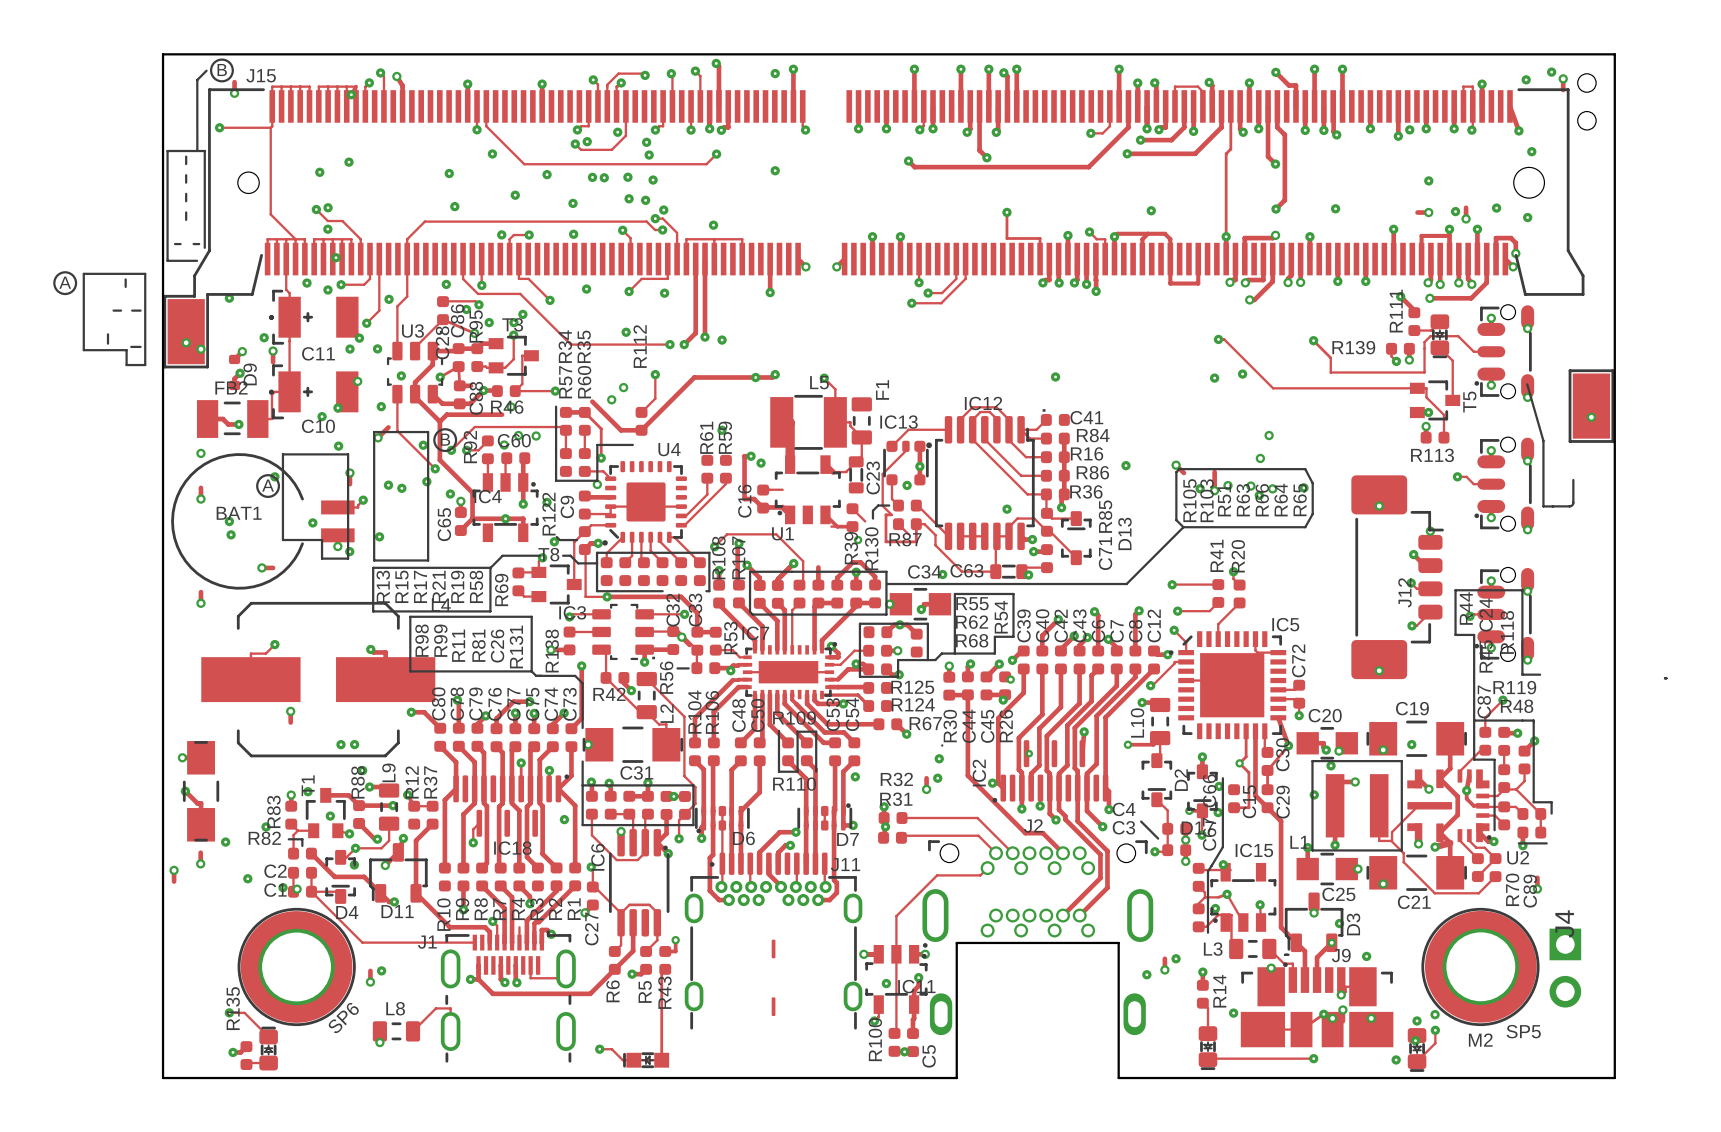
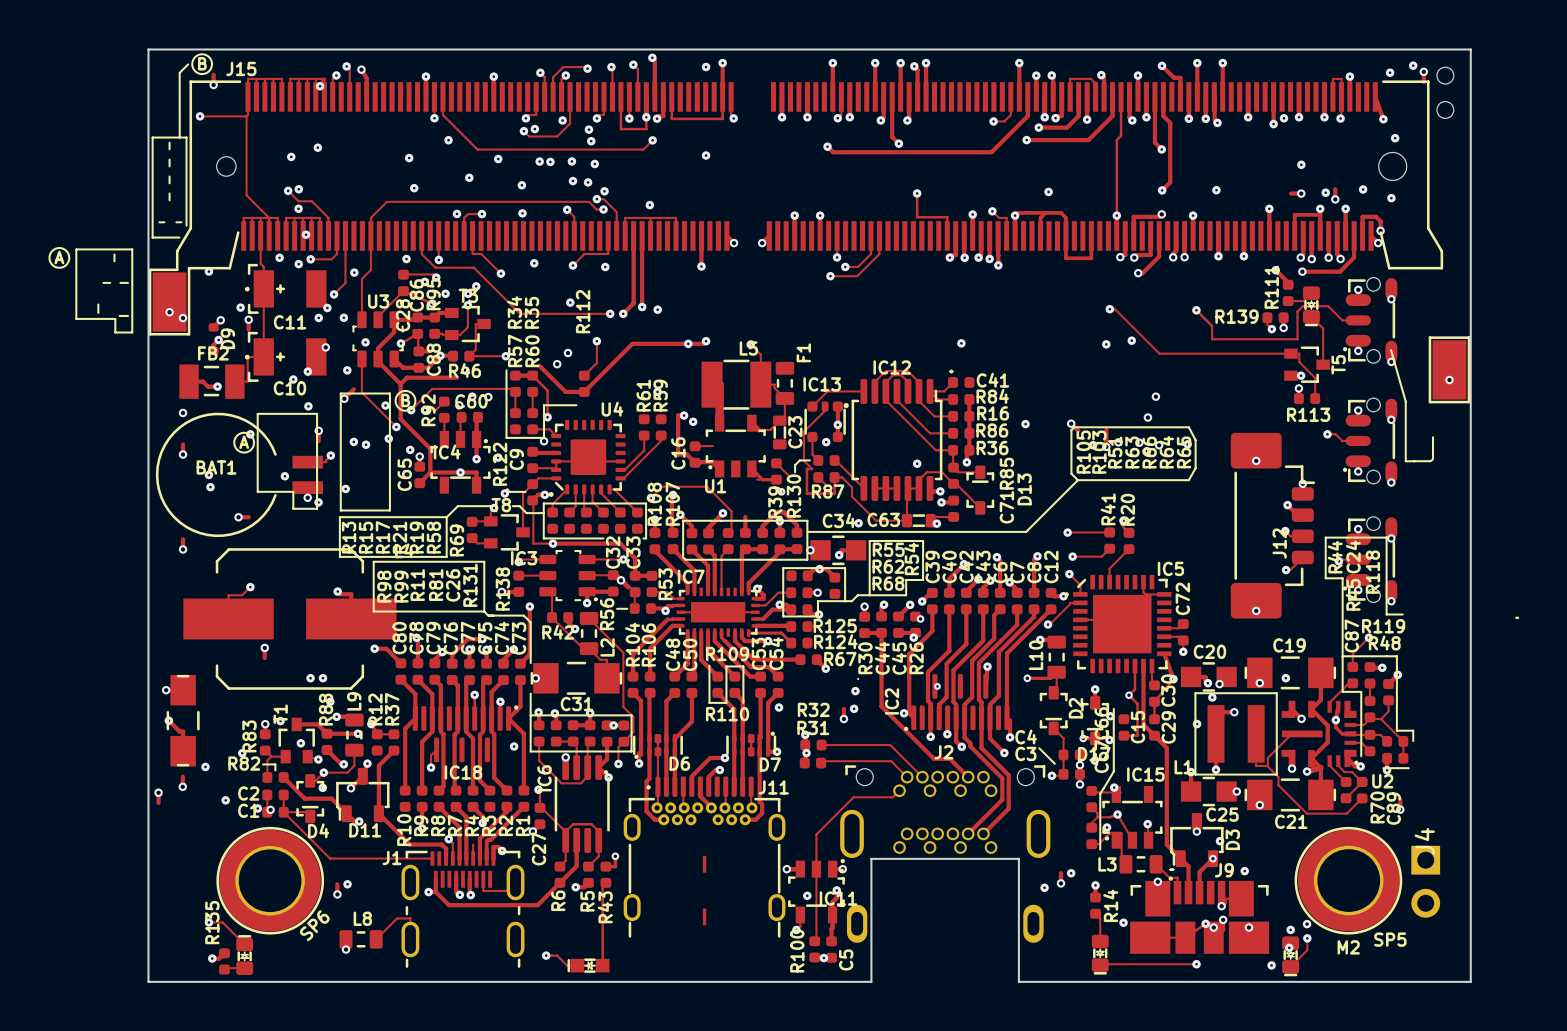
track: none -> (620, 96) (620, 129) (646, 129) (646, 117)
track: none -> (671, 96) (671, 118) (722, 118) (722, 96)

